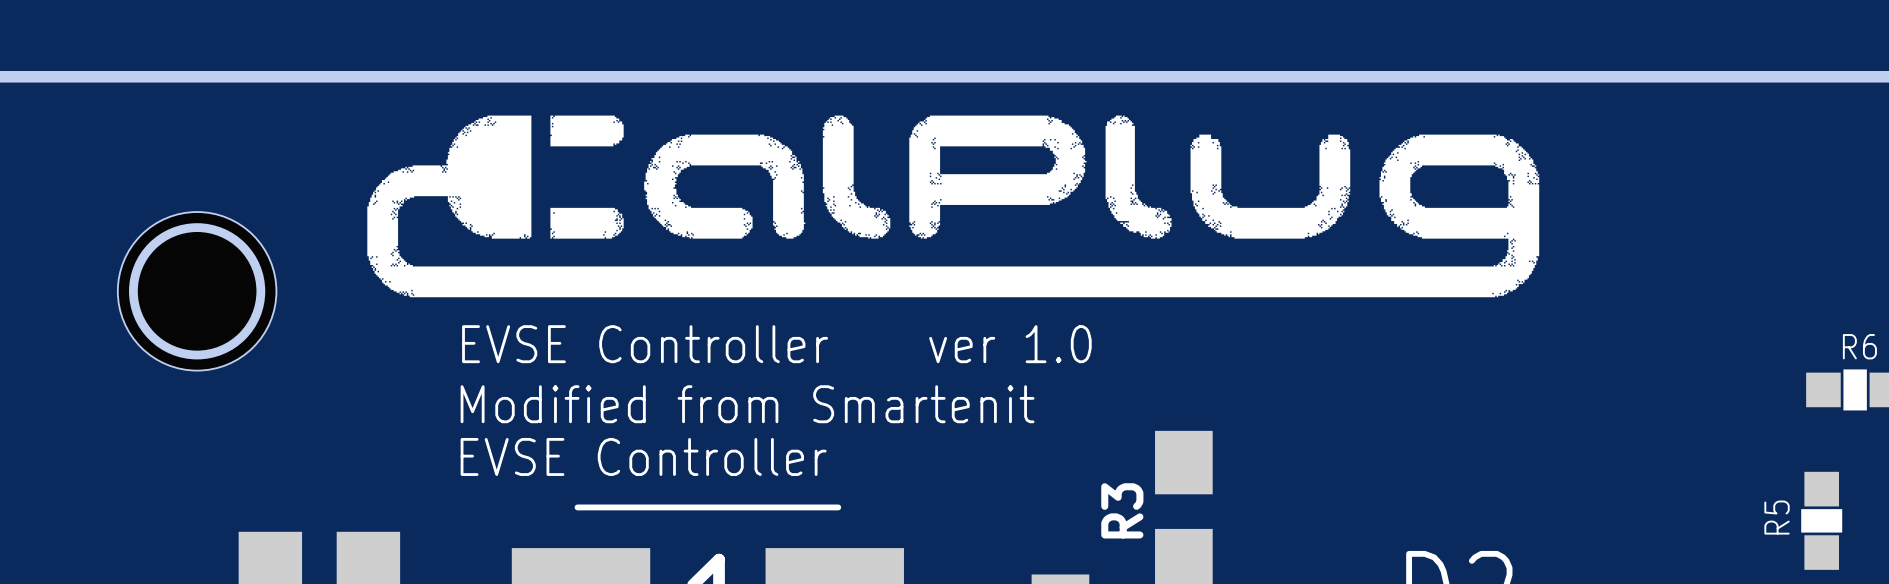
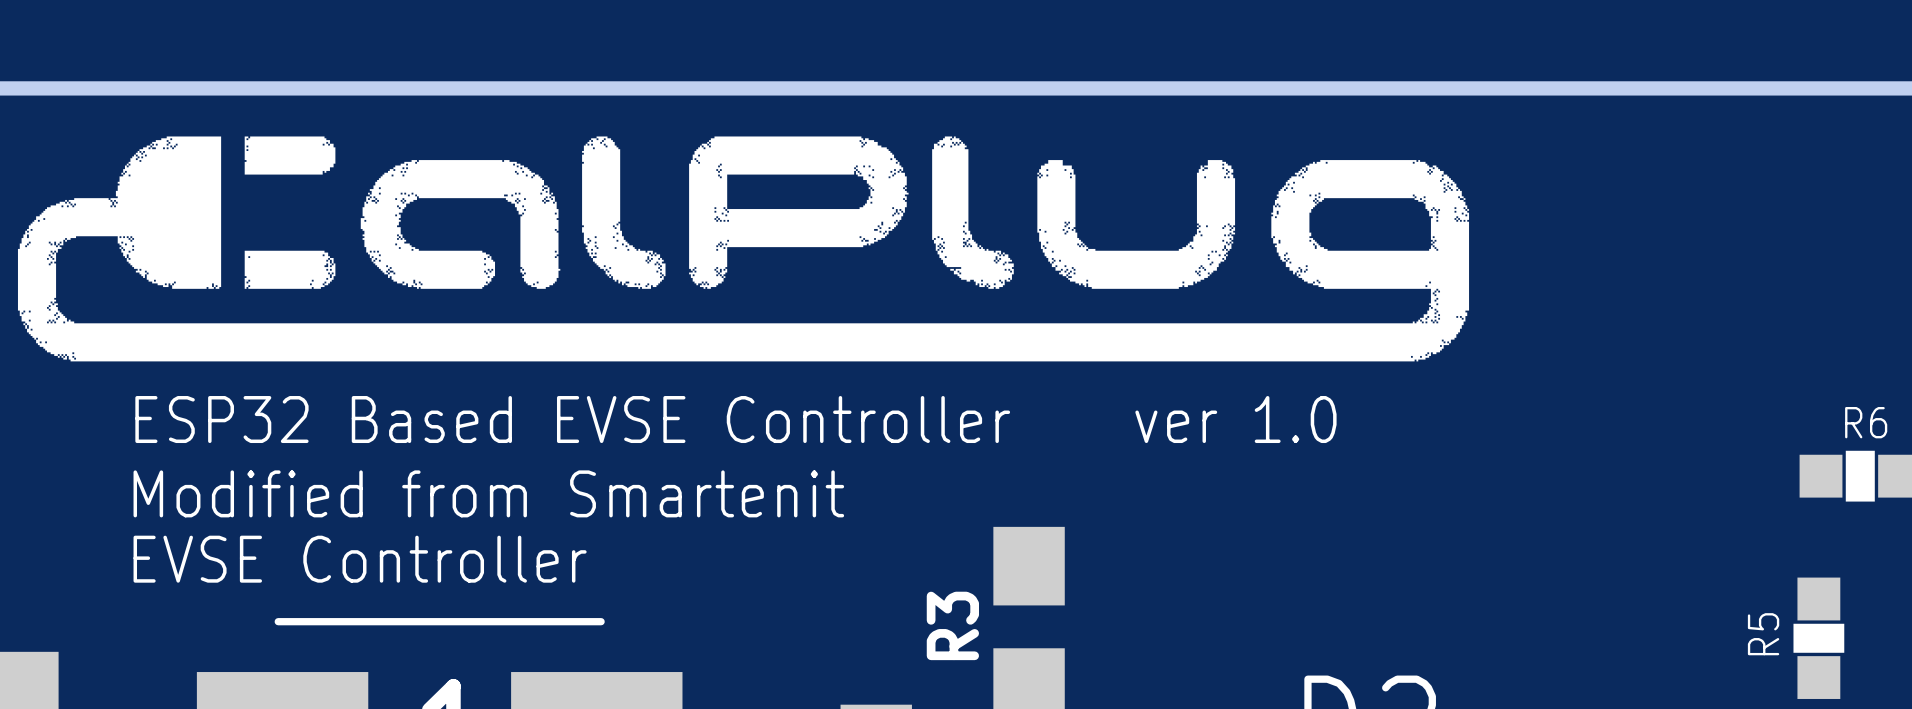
text: EVSE Controller ver 1.0 (776, 344) -> ESP32 Based EVSE Controller ver 1.0 (735, 419)

